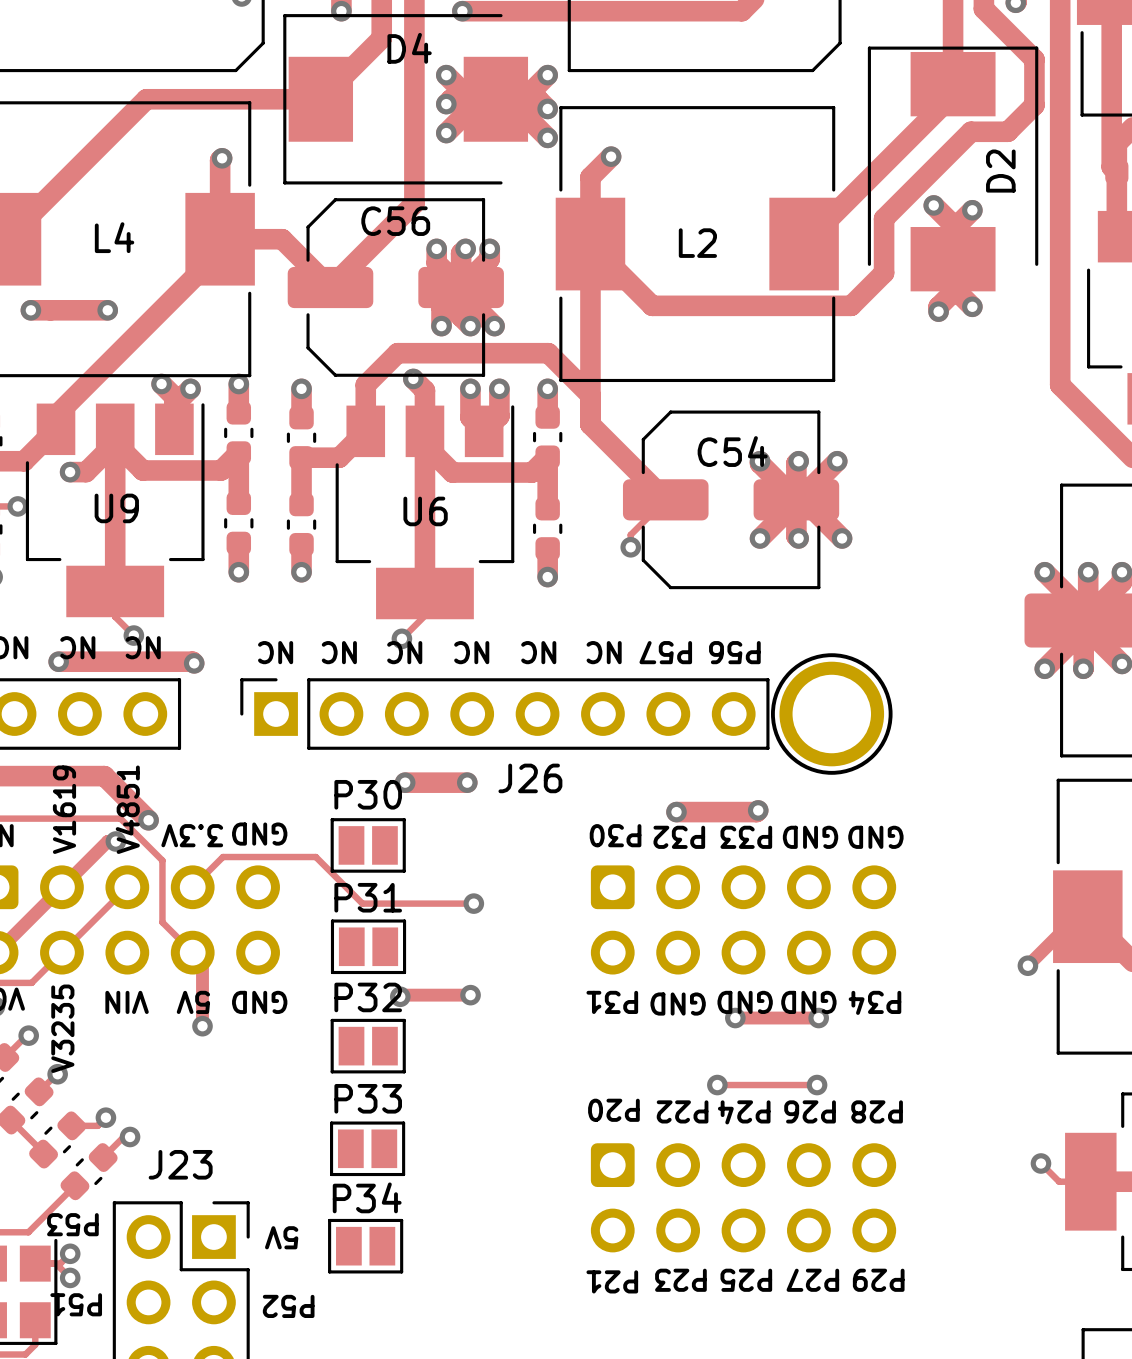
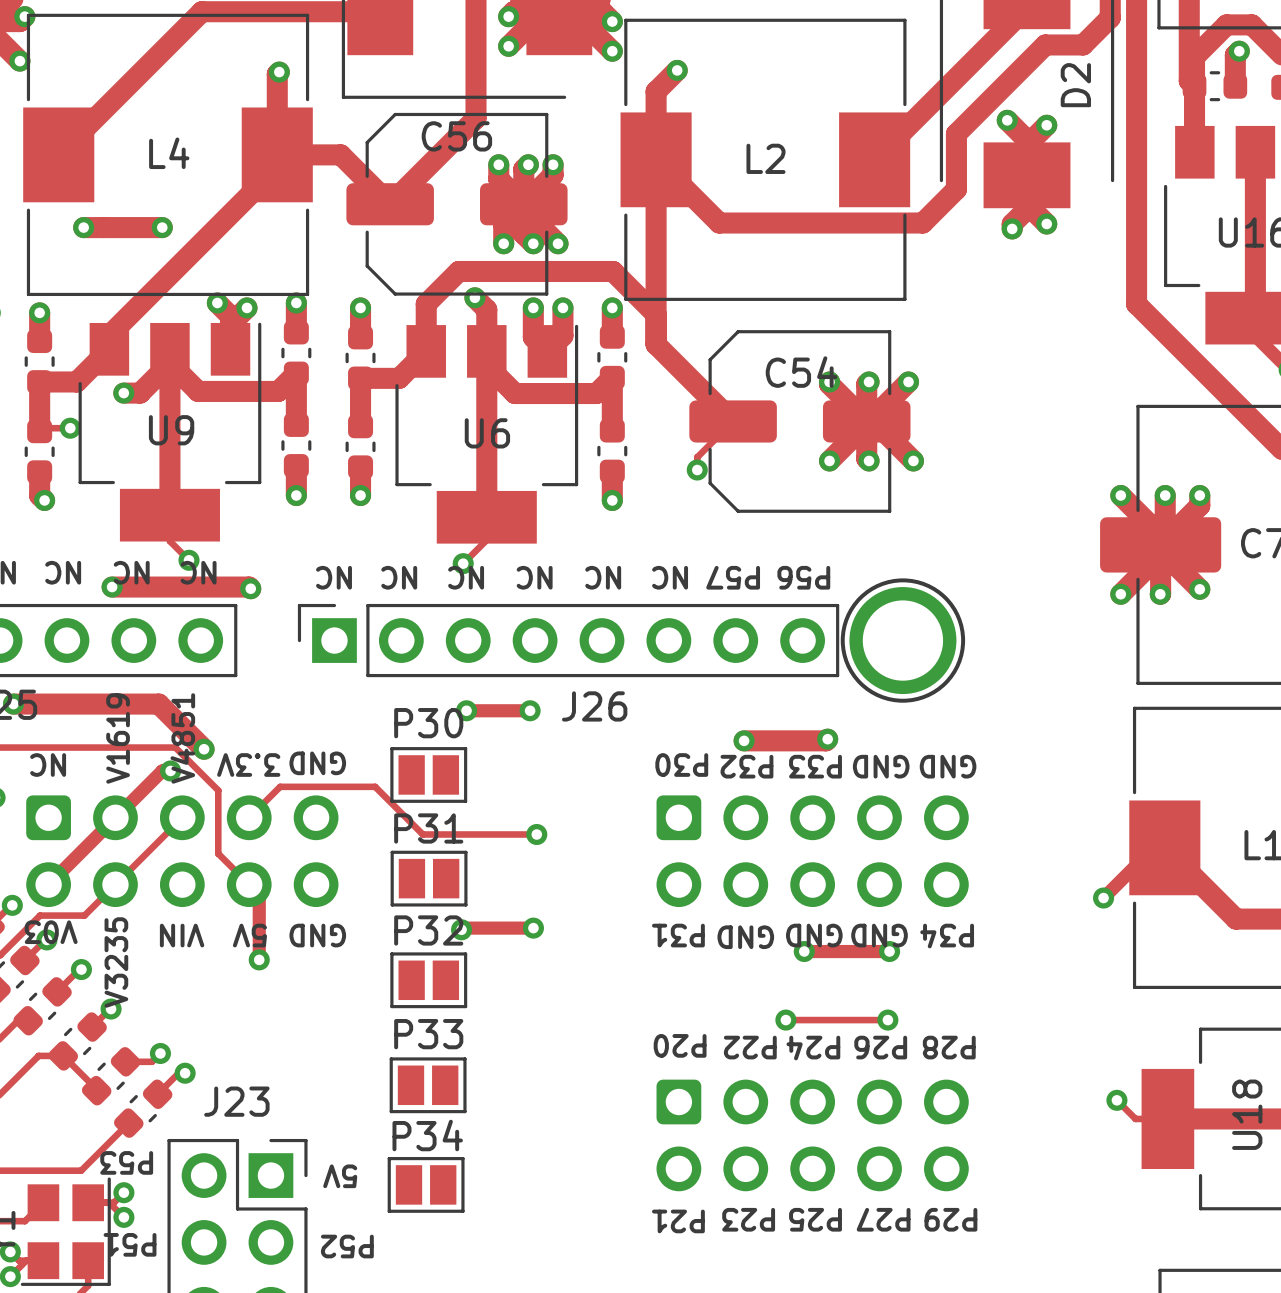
top track width: thick (405, 782) (467, 782) -> thin (466, 710) (530, 710)

